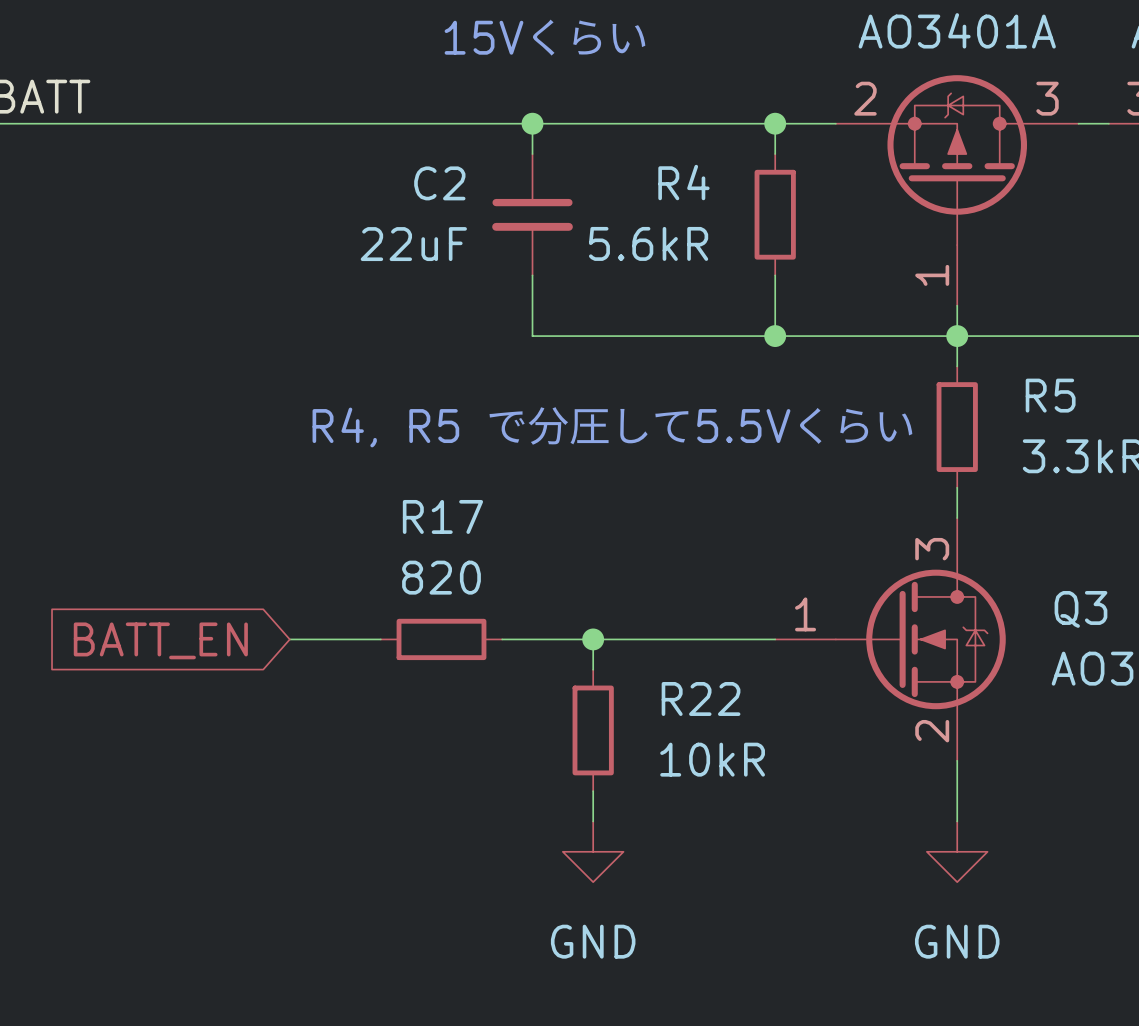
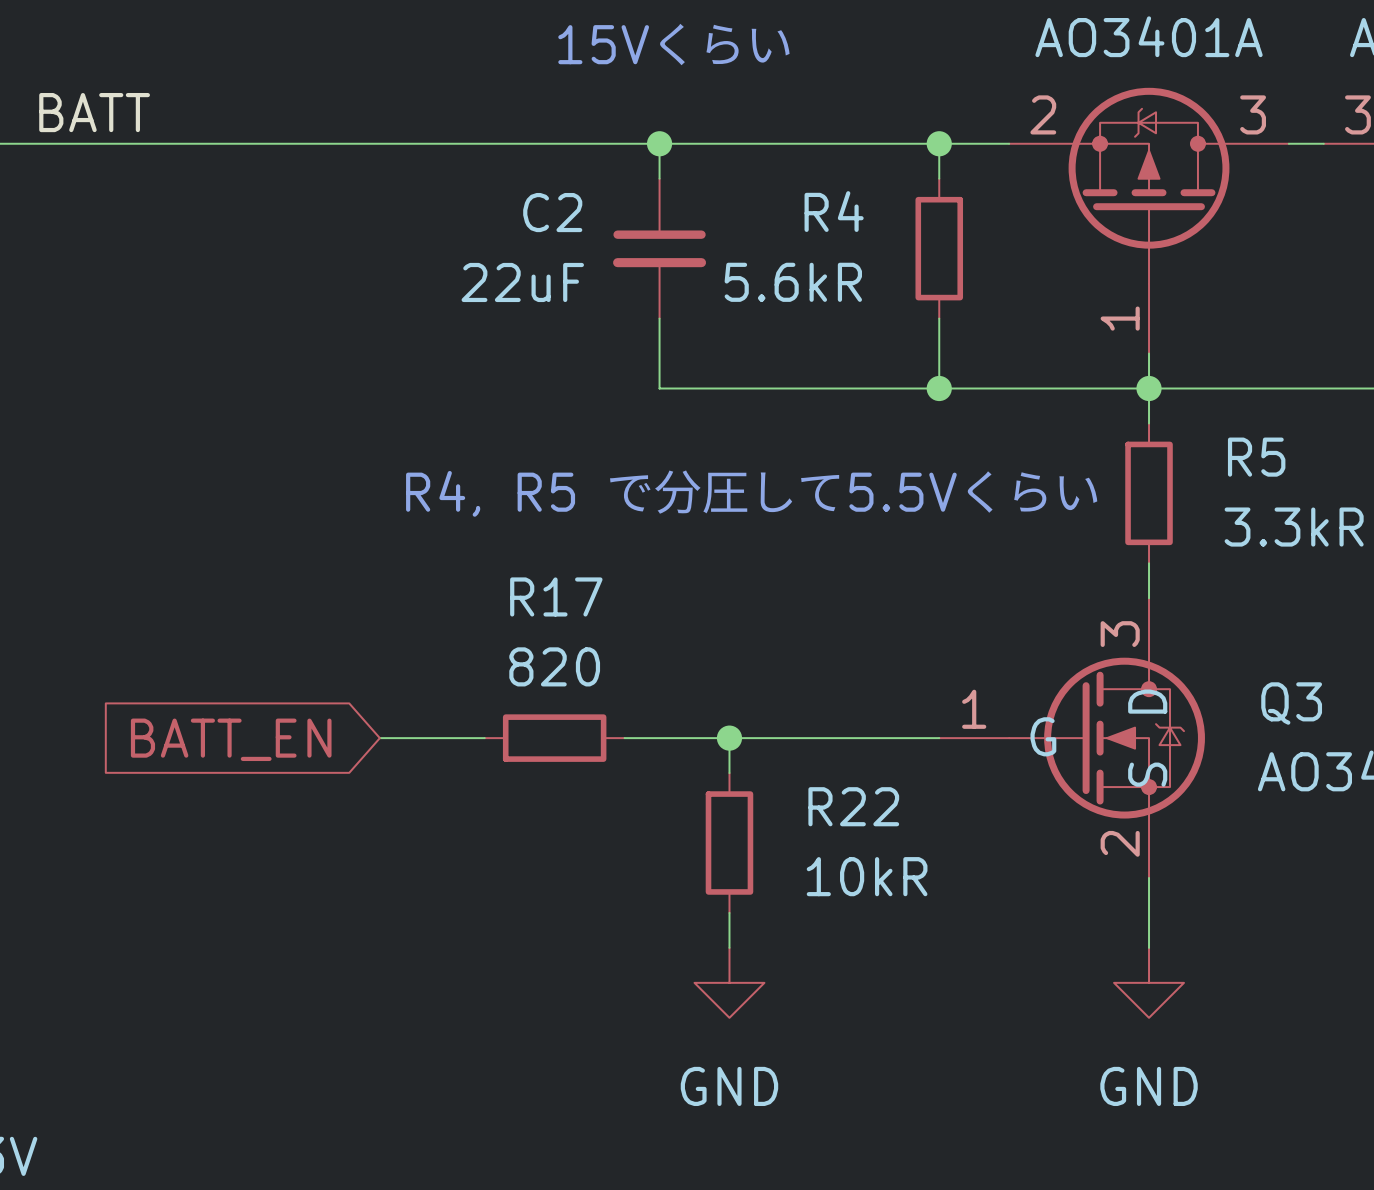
Q3 pin name: none -> D (1147, 701)
Q3 pin name: none -> G (1043, 736)
Q3 pin name: none -> S (1147, 774)

